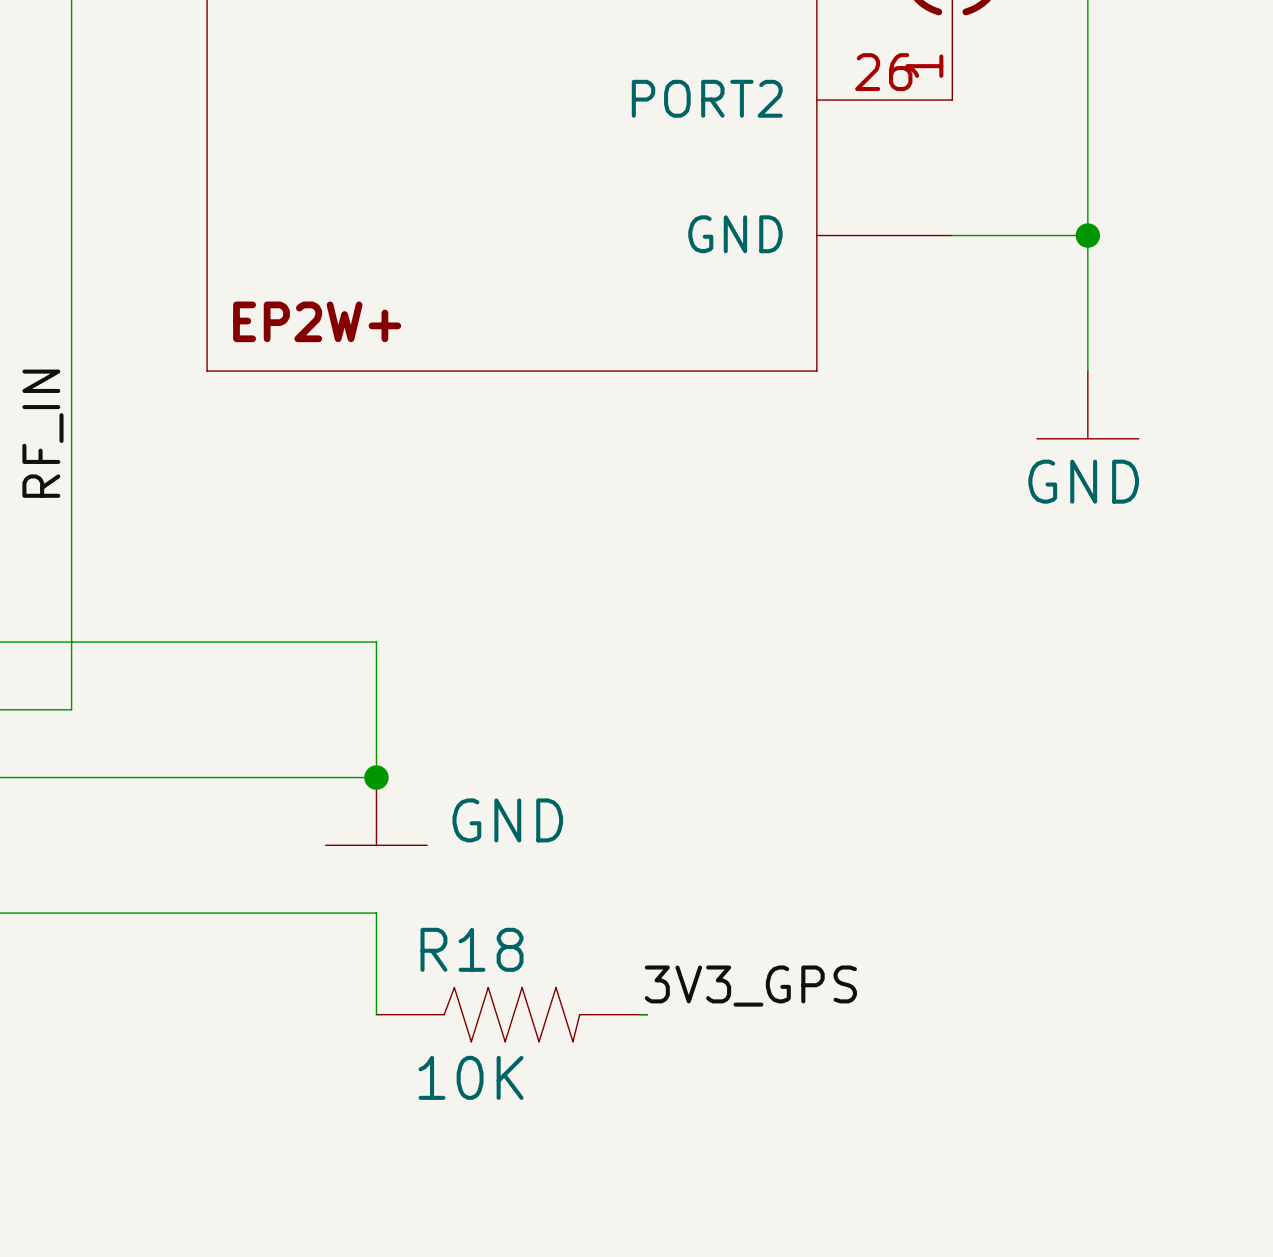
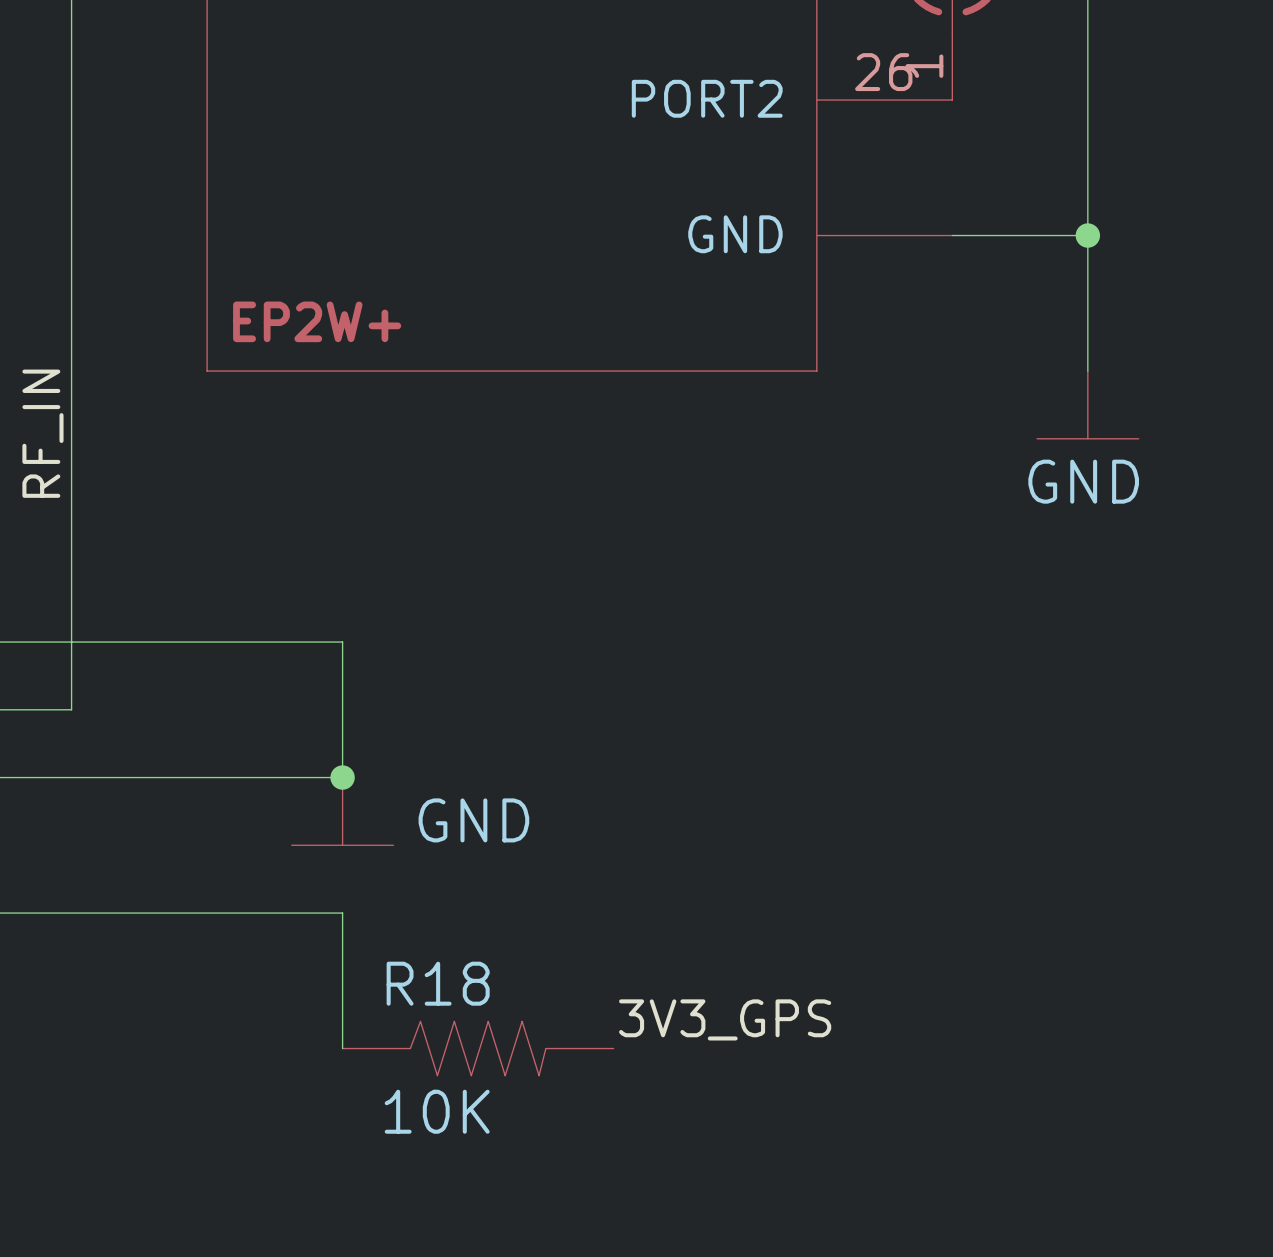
wire: (342, 642) (376, 642) (376, 777) (342, 777) -> (342, 642) (342, 777)
junction position: (376, 777) -> (342, 777)
power symbol position: GND (376, 811) -> GND (342, 811)
wire: (342, 913) (376, 913) (376, 1014) -> (342, 913) (342, 1048)
label position: 3V3_GPS (750, 986) -> 3V3_GPS (725, 1019)
R18 position: (511, 1014) -> (478, 1048)
wire: (639, 1014) (647, 1014) -> none

